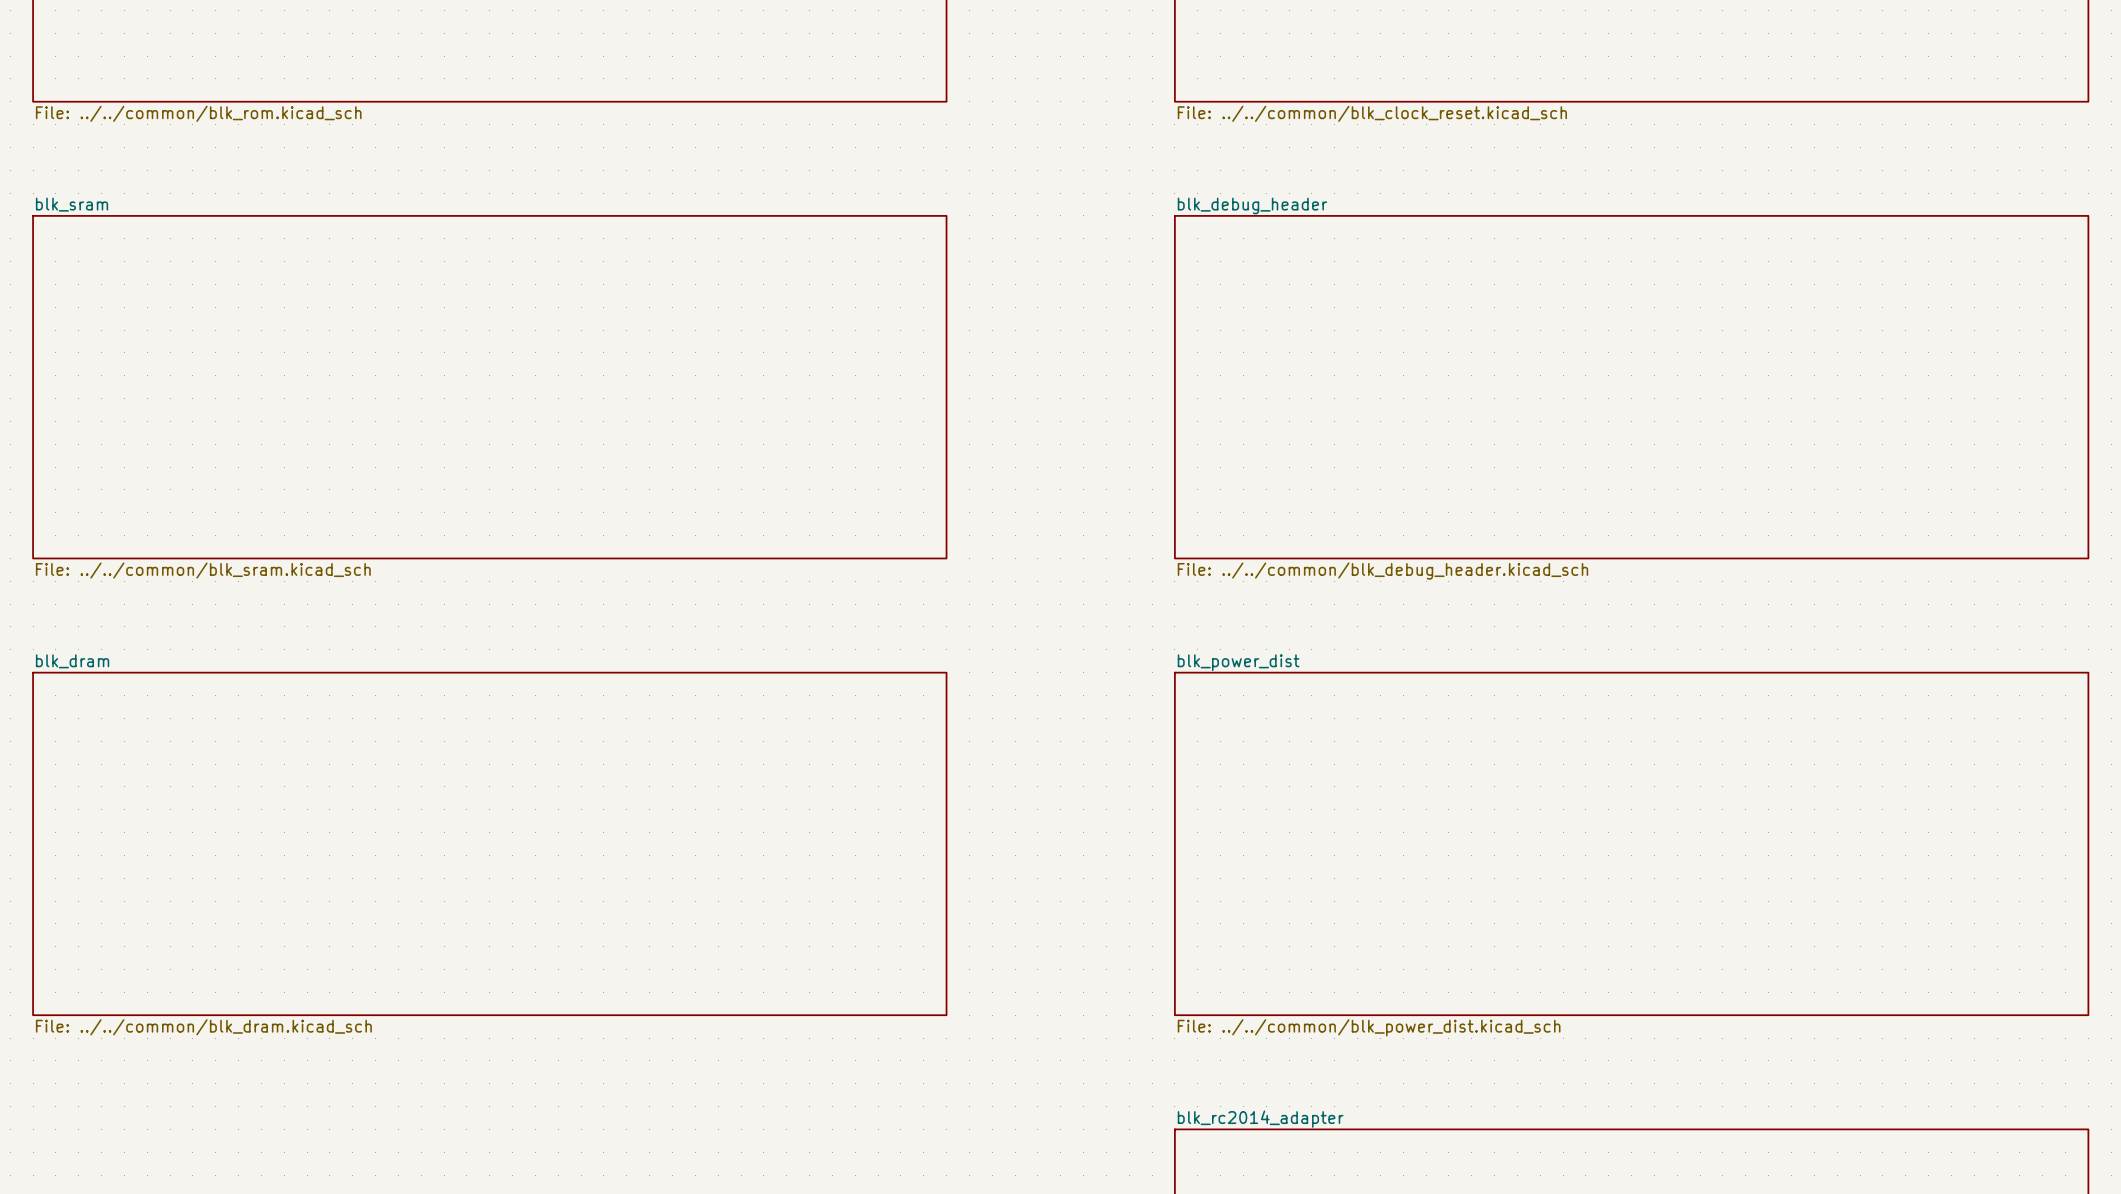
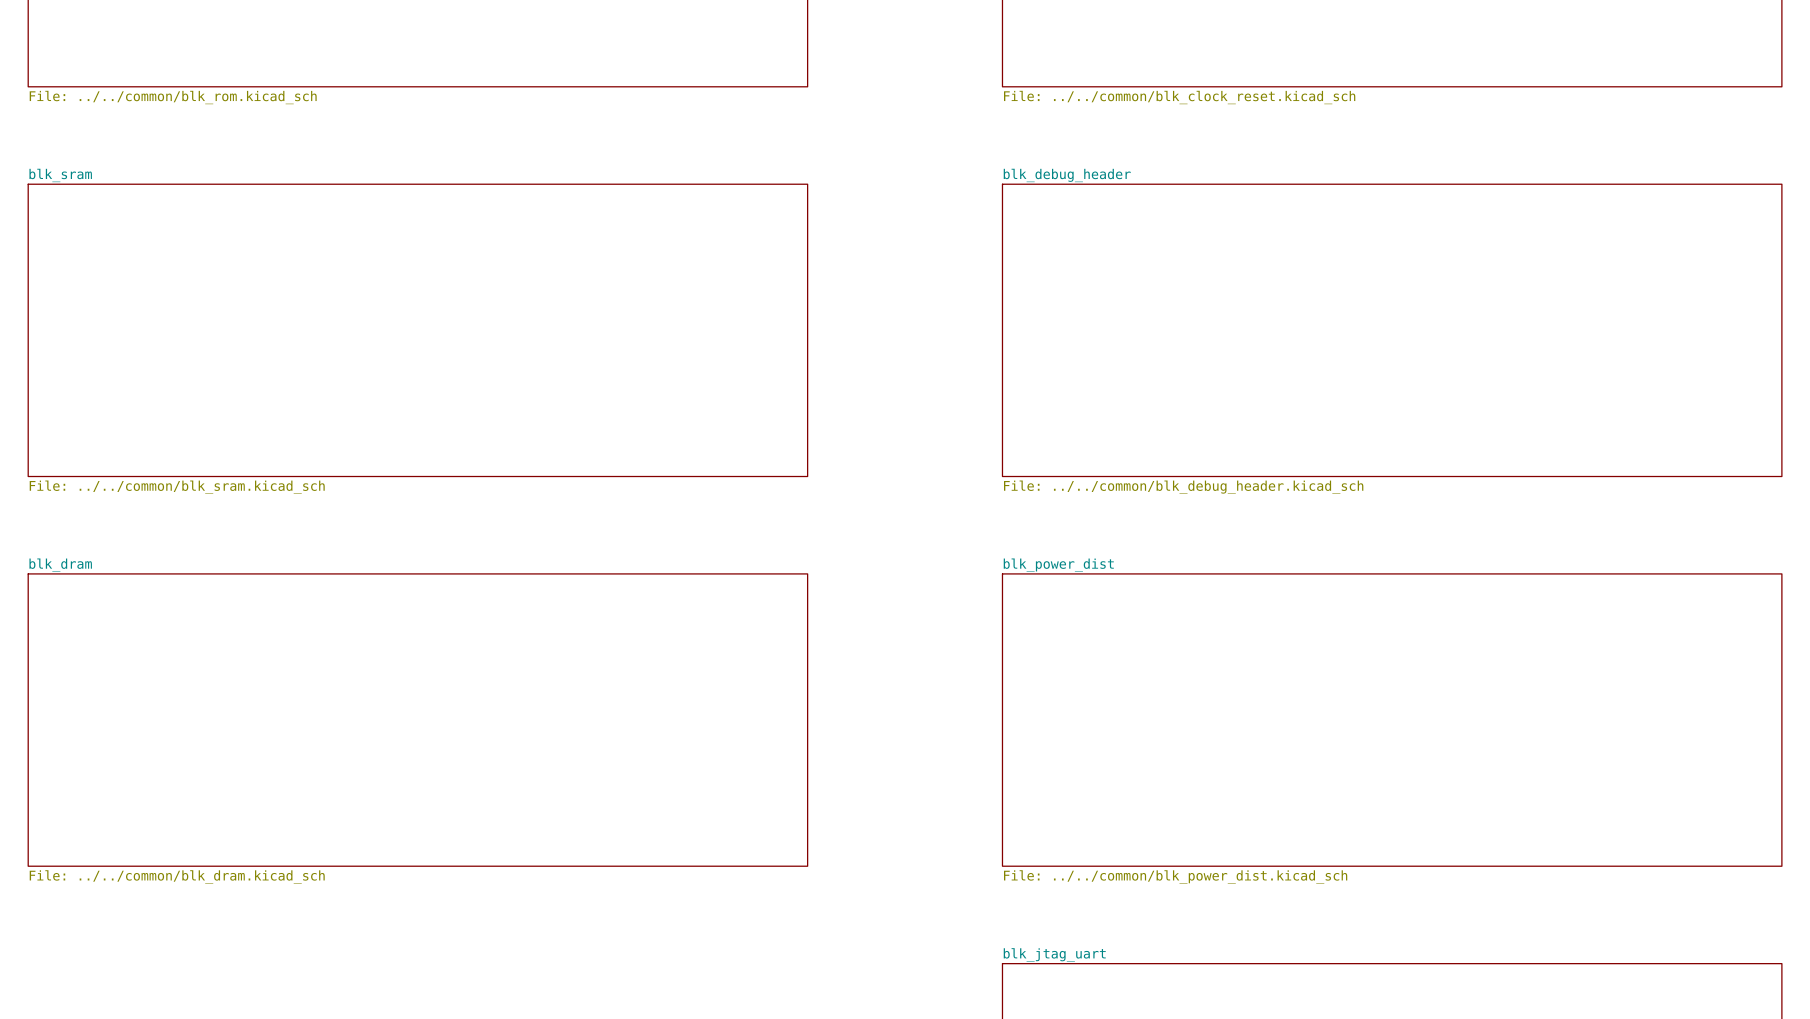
sheet blk_rc2014_adapter name: blk_rc2014_adapter (1260, 1119) -> blk_jtag_uart (1054, 954)

